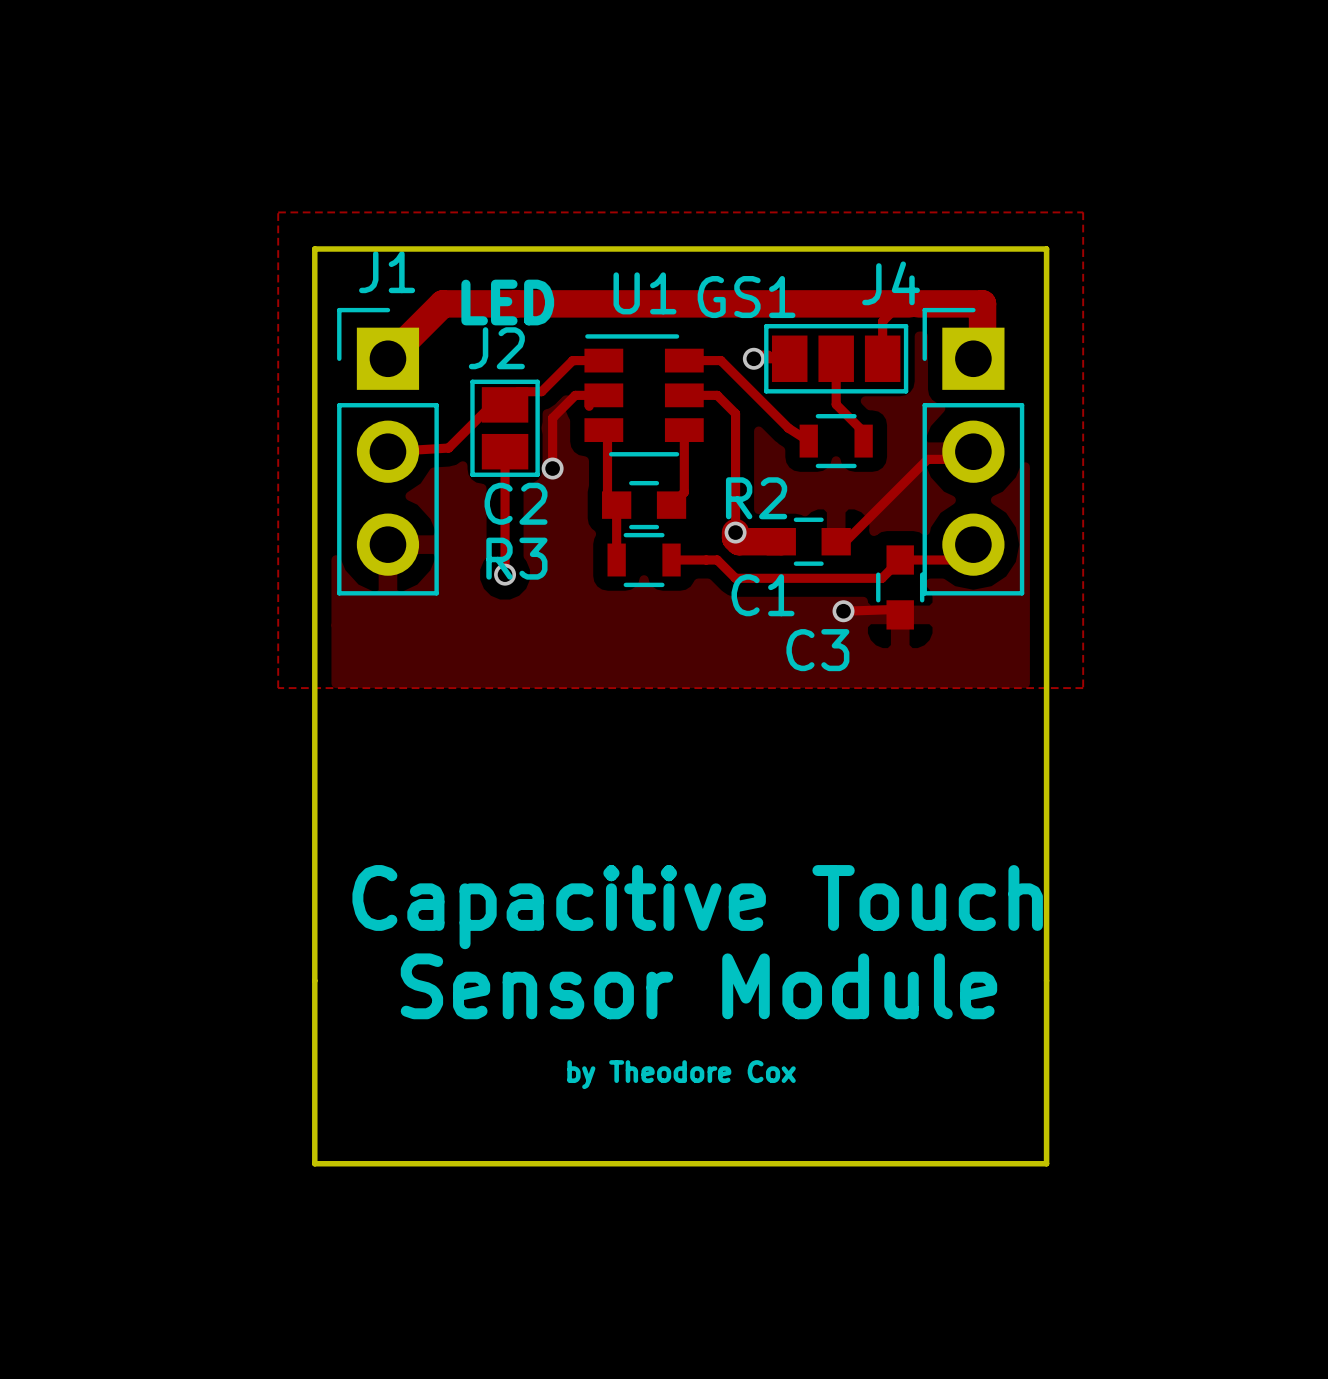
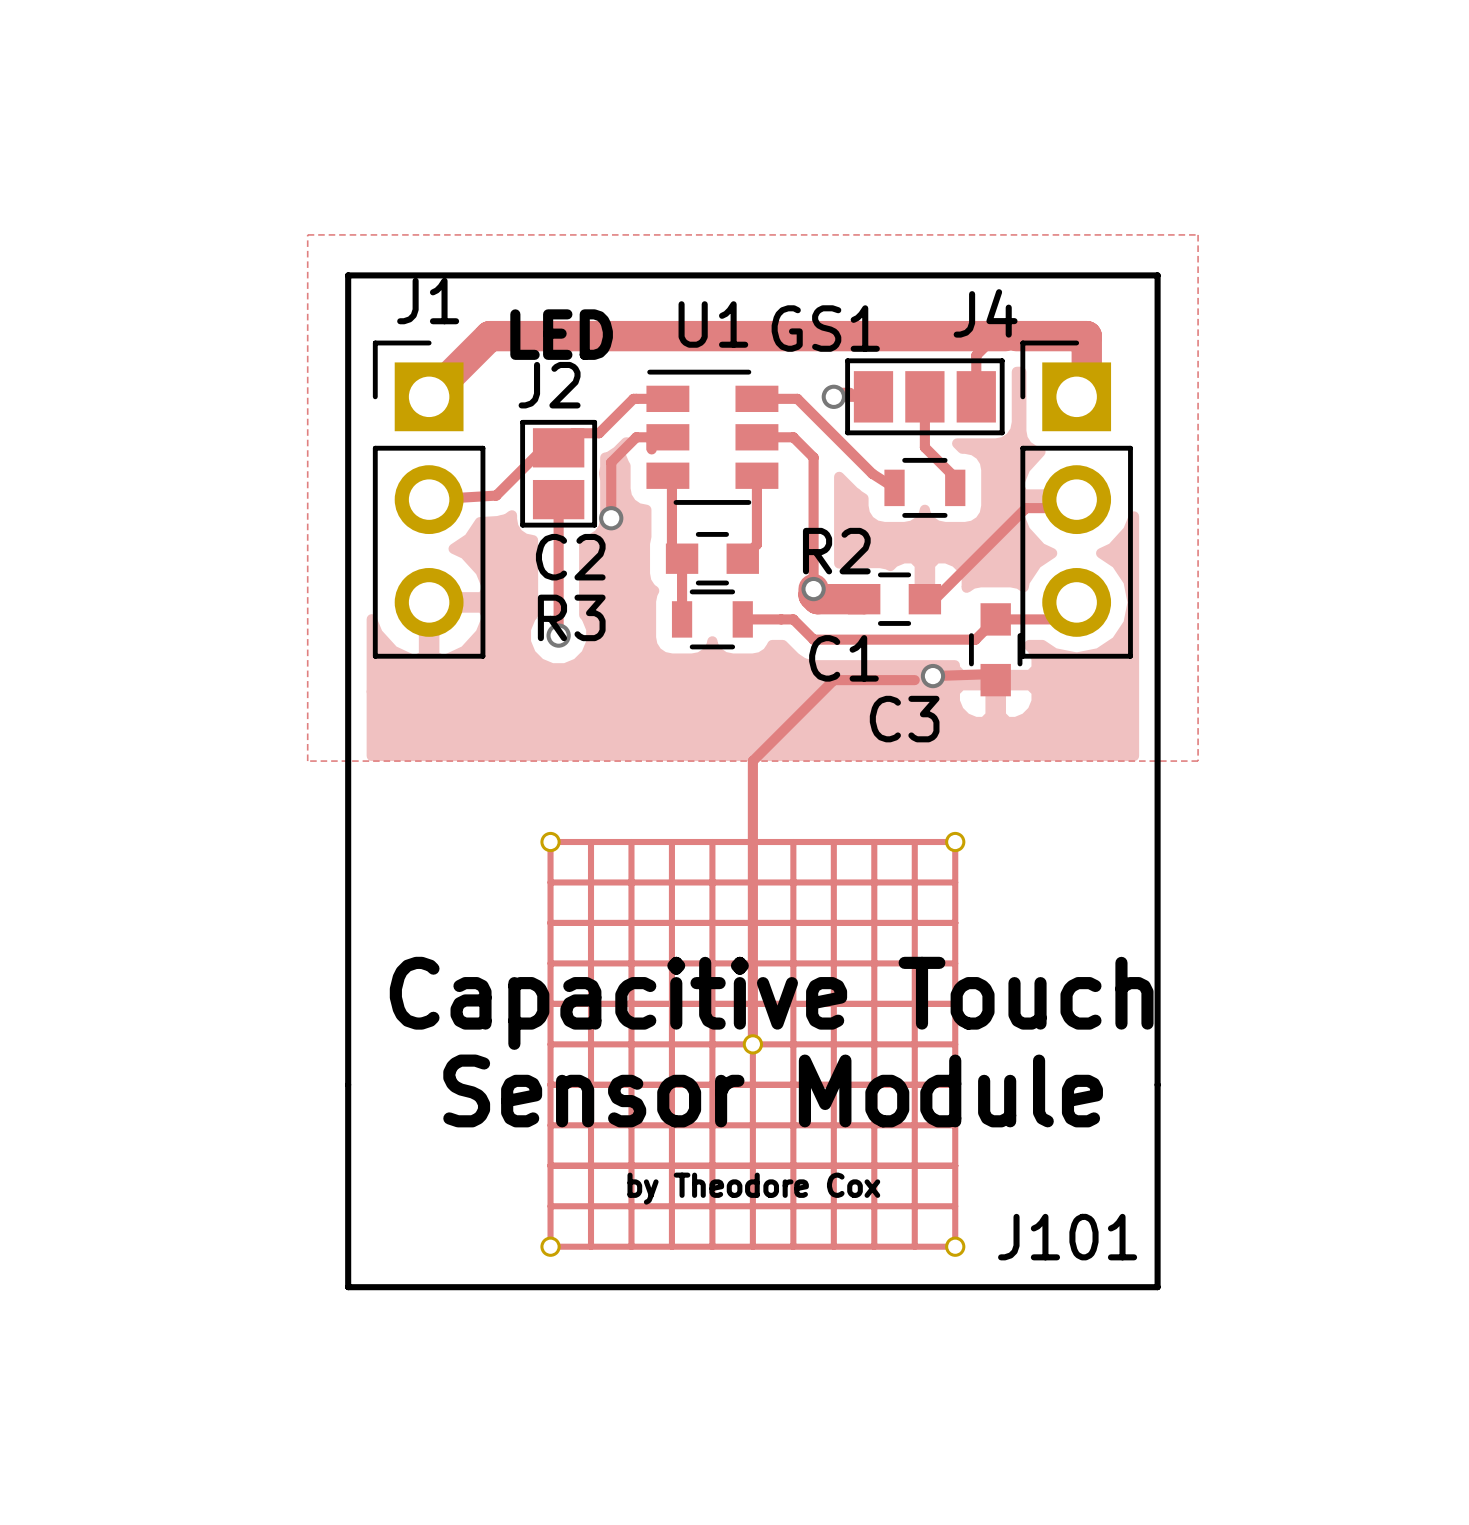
track: none -> (914, 680) (833, 680) (752, 761) (752, 1044)
J101: none -> (752, 1044)

